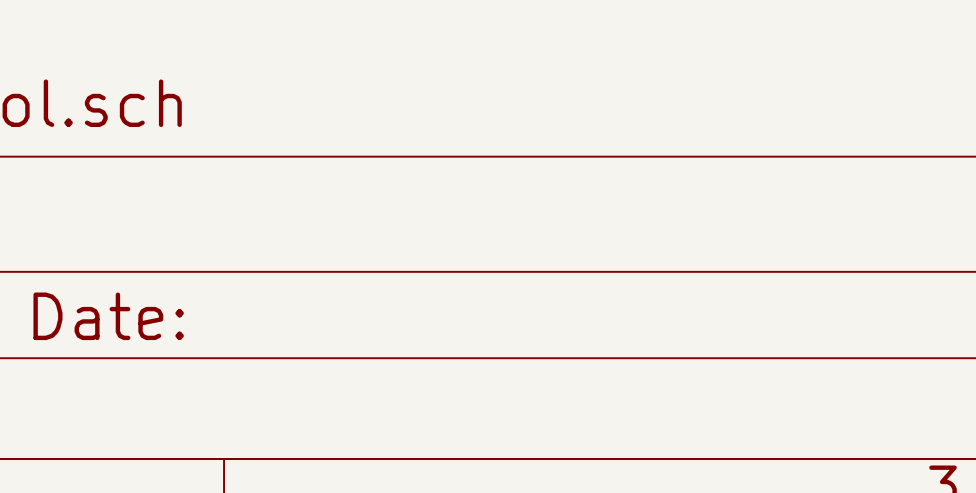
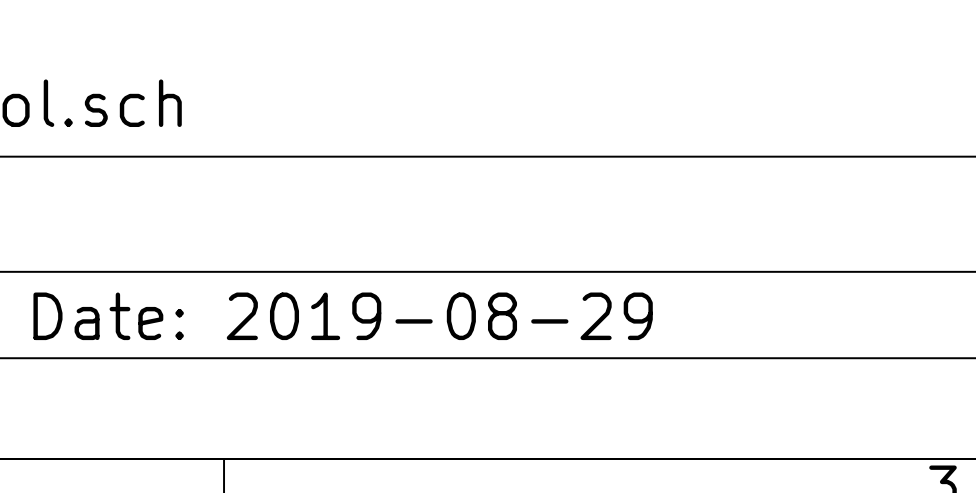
title block: Date: (108, 316) -> Date: 2019-08-29 (343, 316)

